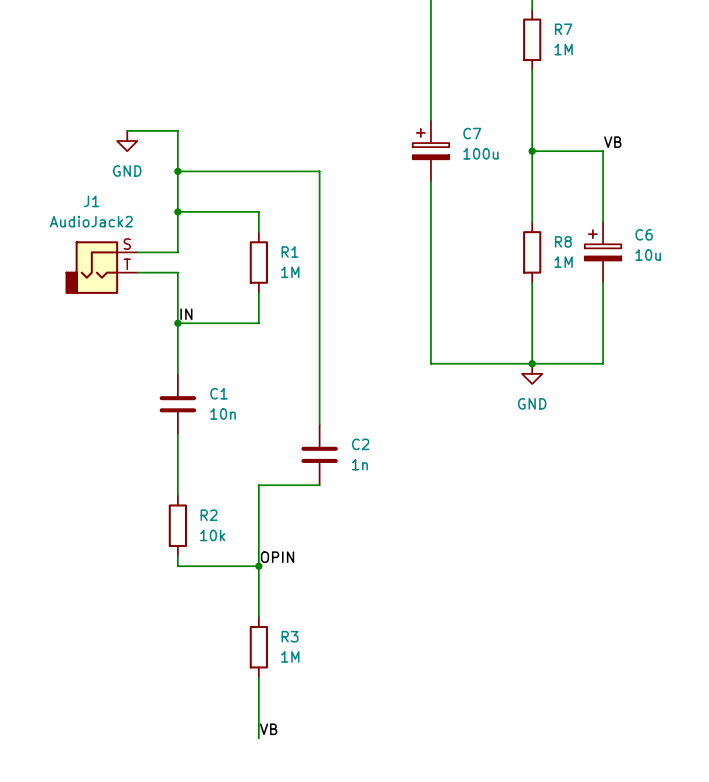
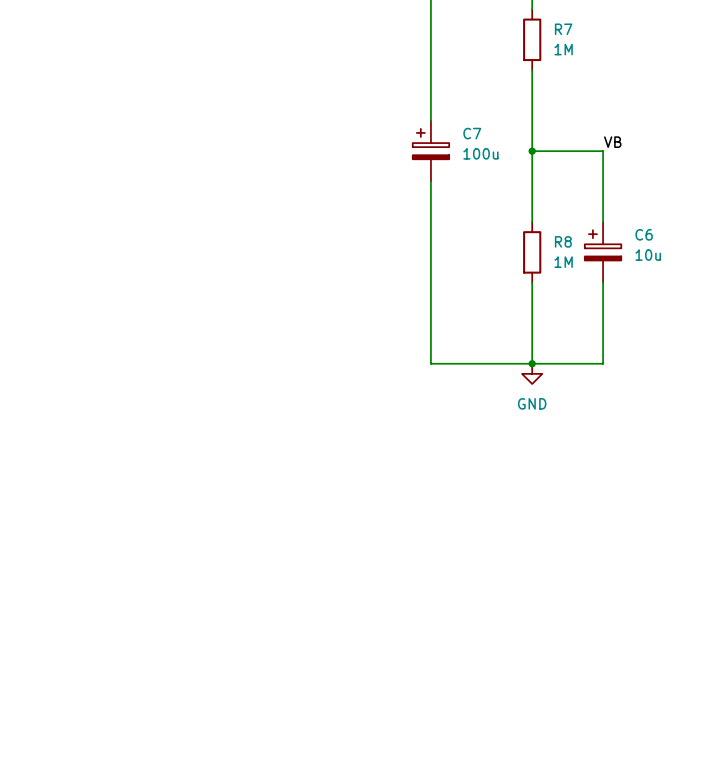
wire: (127, 130) (177, 130) (177, 252) (137, 252) -> none
power symbol: GND (127, 141) -> none
wire: (177, 171) (319, 171) (319, 424) -> none
junction: (177, 171) -> none
wire: (177, 211) (258, 211) (258, 232) -> none
junction: (177, 211) -> none
R1: 1M (258, 262) -> none
J1: AudioJack2 (101, 267) -> none
wire: (137, 272) (177, 272) (177, 373) -> none
wire: (258, 292) (258, 323) (177, 323) -> none
label: IN (186, 314) -> none
junction: (177, 323) -> none
C1: 10n (177, 404) -> none
wire: (177, 434) (177, 495) -> none
C2: 1n (319, 454) -> none
wire: (319, 485) (258, 485) (258, 616) -> none
R2: 10k (177, 525) -> none
wire: (177, 556) (177, 566) (258, 566) -> none
label: OPIN (277, 557) -> none
junction: (258, 566) -> none
R3: 1M (258, 647) -> none
wire: (258, 677) (258, 738) -> none
label: VB (268, 729) -> none

